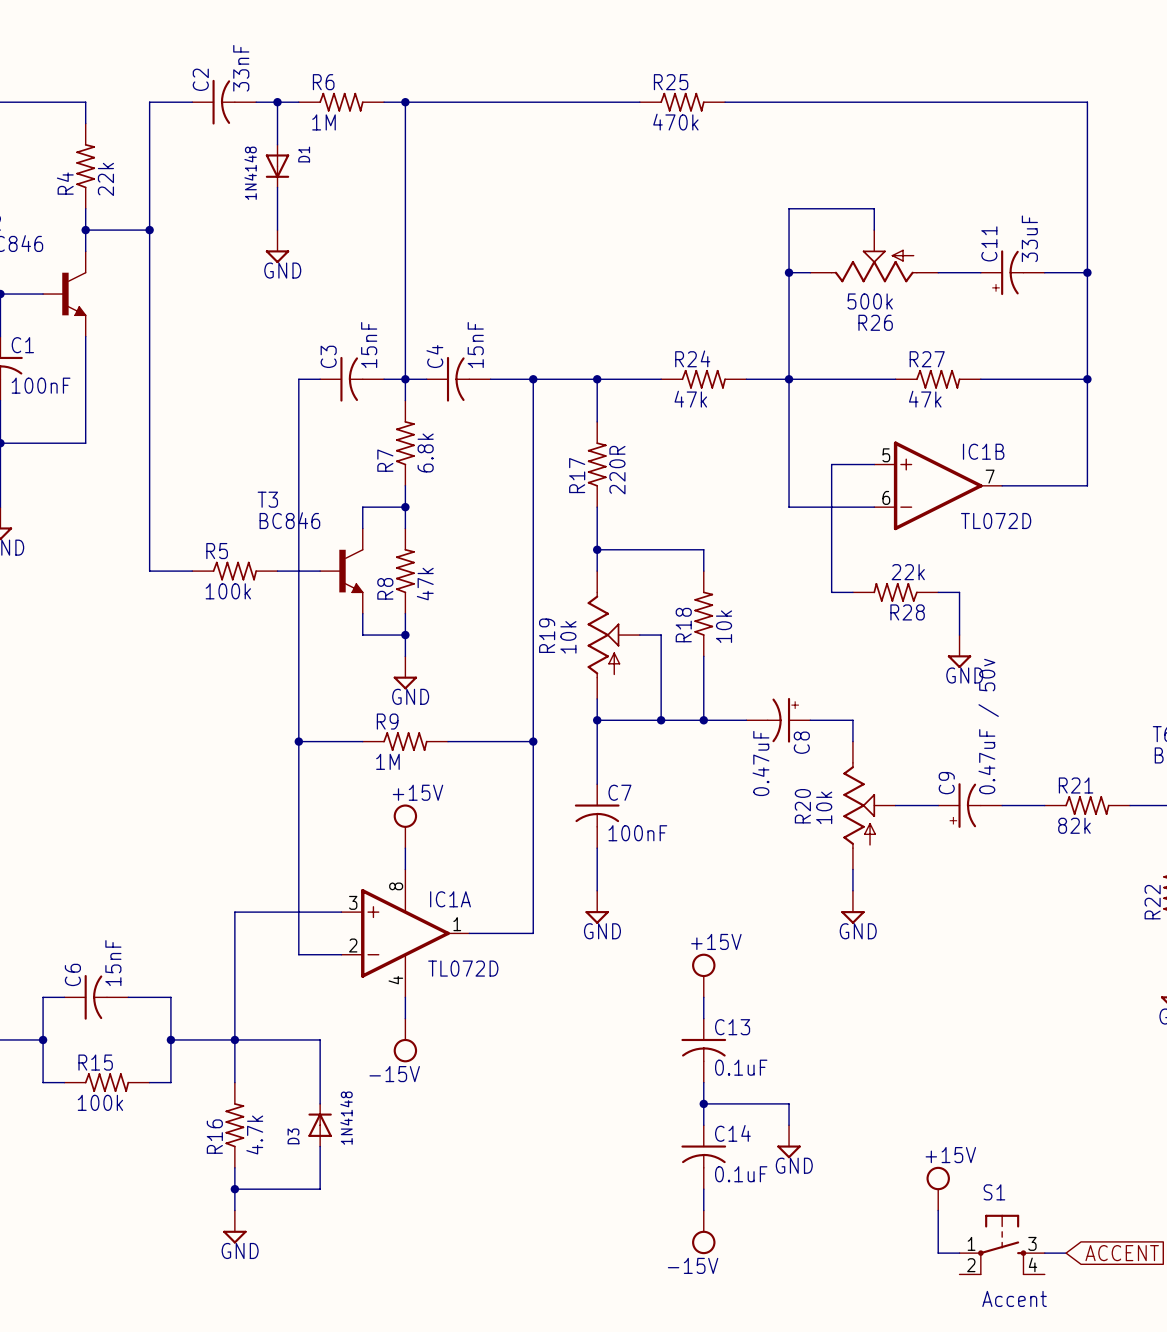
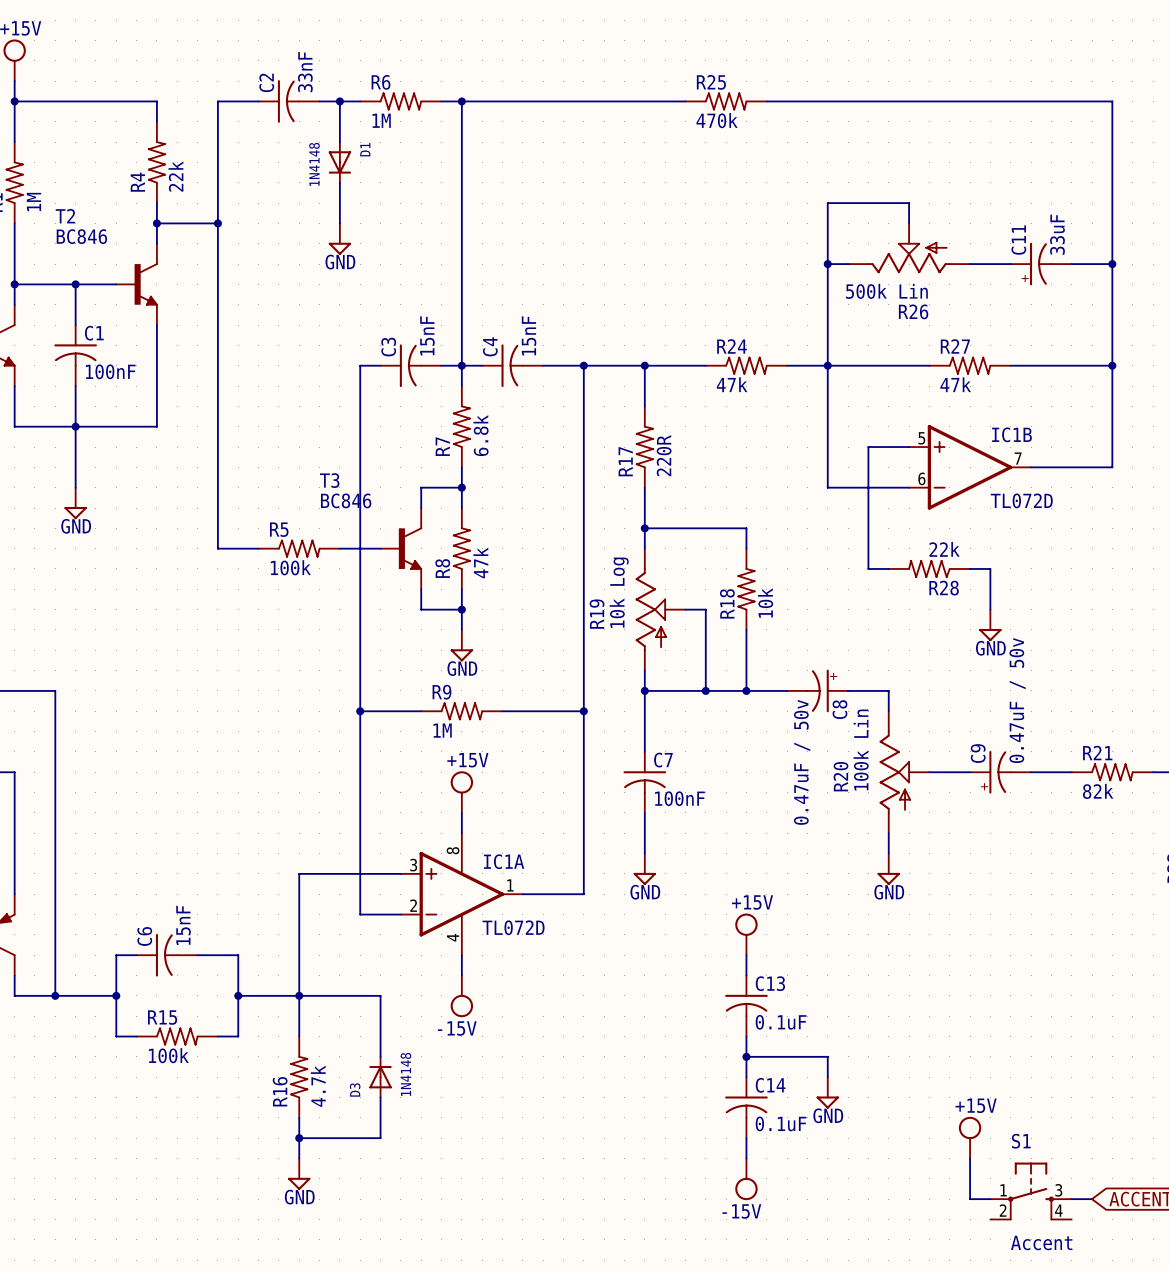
R26 value: 500k (870, 301) -> 500k Lin (886, 291)
R19 value: 10k (568, 637) -> 10k Log (619, 592)
C8 value: 0.47uF (760, 763) -> 0.47uF / 50v (802, 762)
R20 value: 10k (824, 807) -> 100k Lin (861, 750)

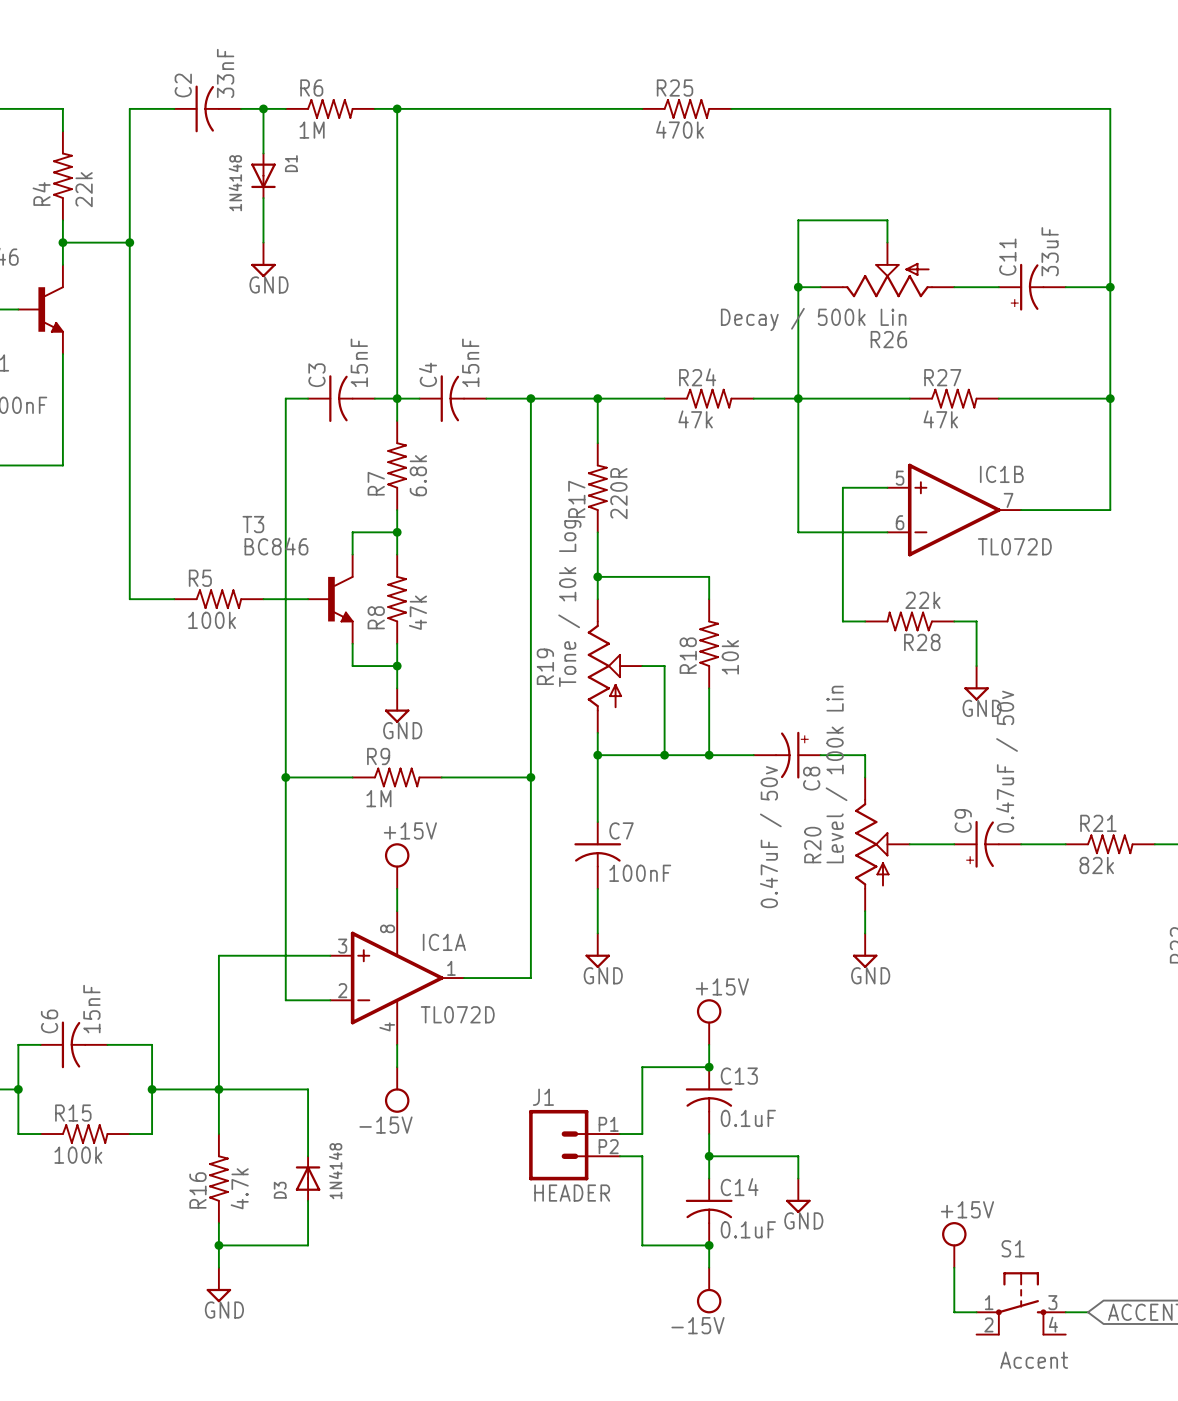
R26 value: 500k Lin (886, 291) -> Decay / 500k Lin (813, 319)
R19 value: 10k Log (619, 592) -> Tone / 10k Log (569, 603)
R20 value: 100k Lin (861, 750) -> Level / 100k Lin (836, 774)
wire: none -> (709, 1067) (642, 1067) (642, 1134) (620, 1134)
junction: none -> (709, 1067)
J1: none -> HEADER (574, 1145)
wire: none -> (620, 1156) (642, 1156) (642, 1245) (709, 1245)
junction: none -> (709, 1245)

